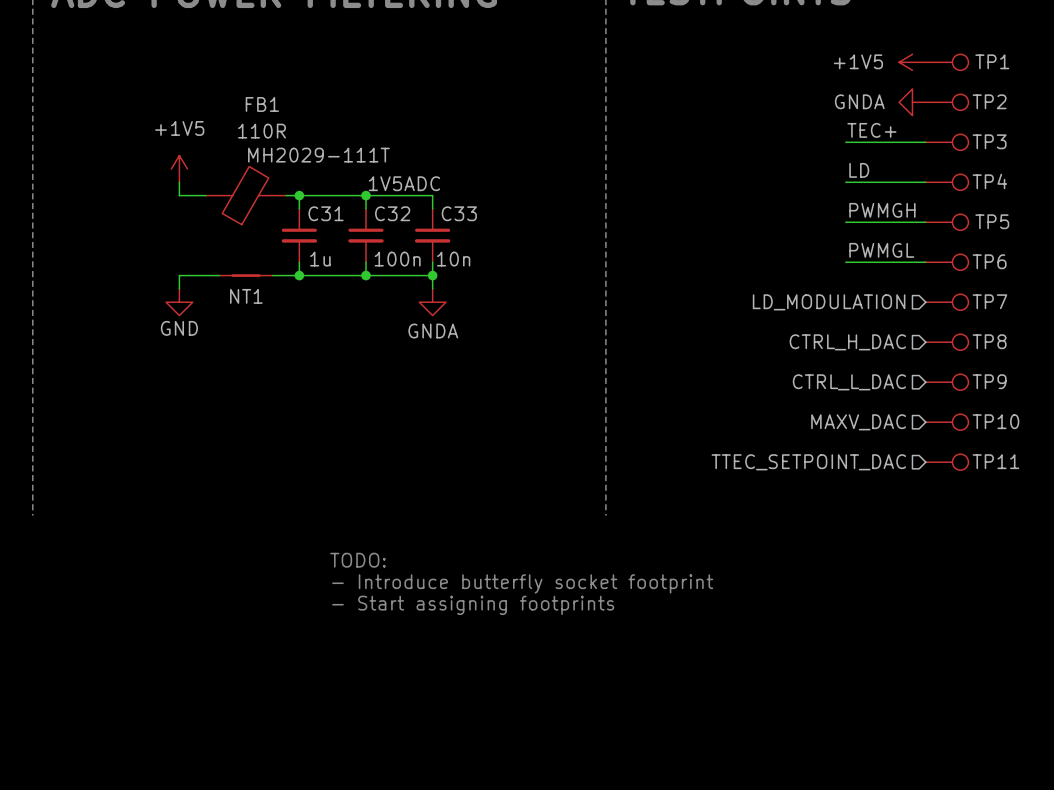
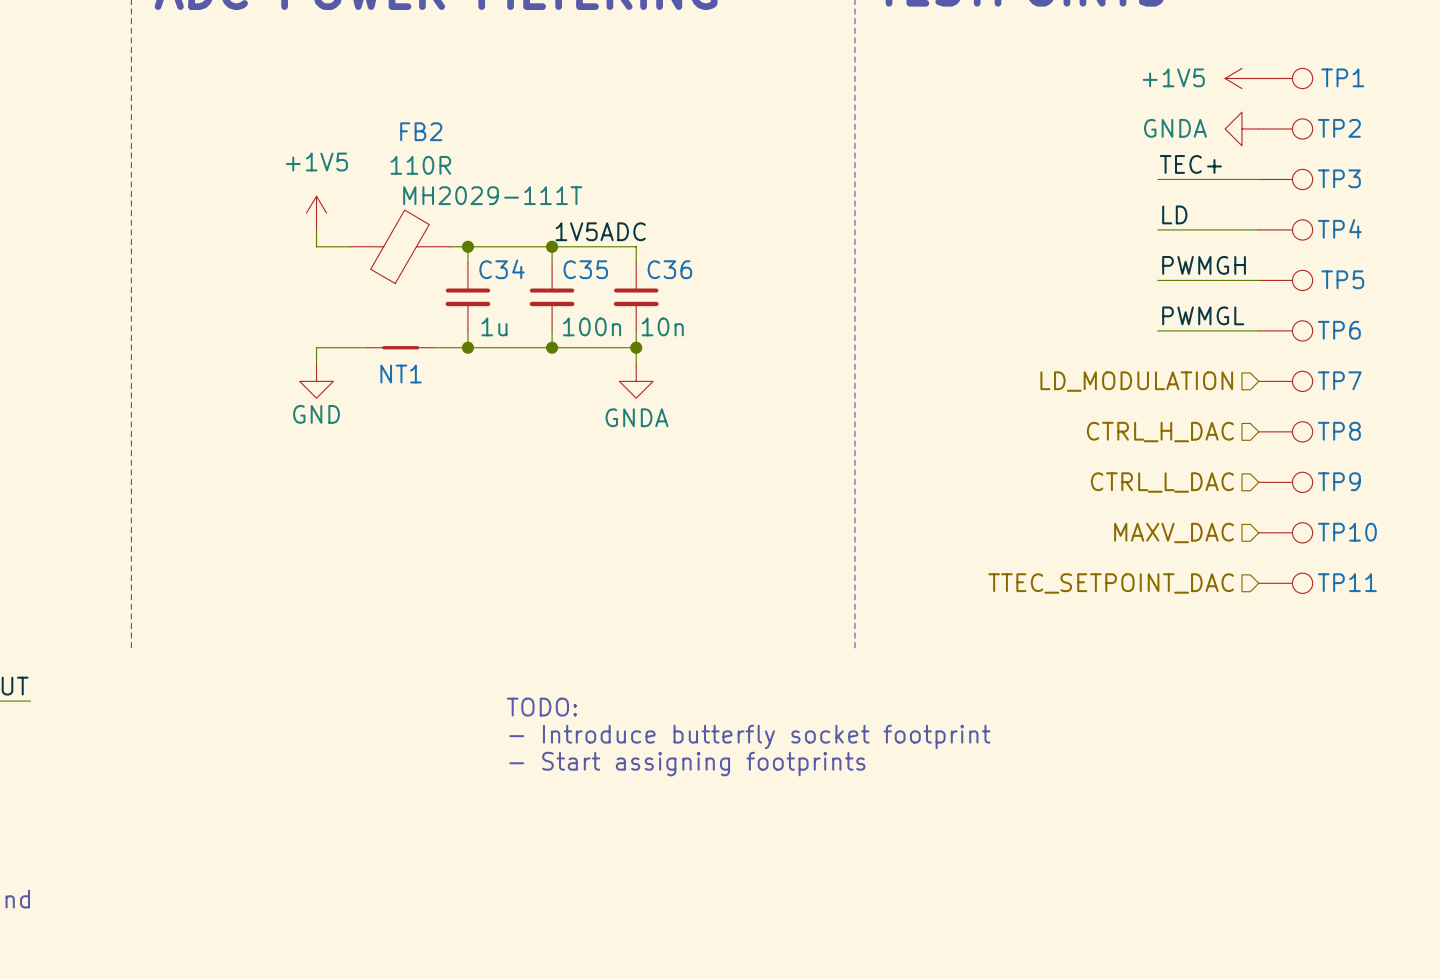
FB1 name: FB1 (262, 104) -> FB2 (421, 131)
C31 name: C31 (326, 213) -> C34 (502, 269)
C32 name: C32 (392, 213) -> C35 (585, 269)
C33 name: C33 (459, 213) -> C36 (669, 269)

